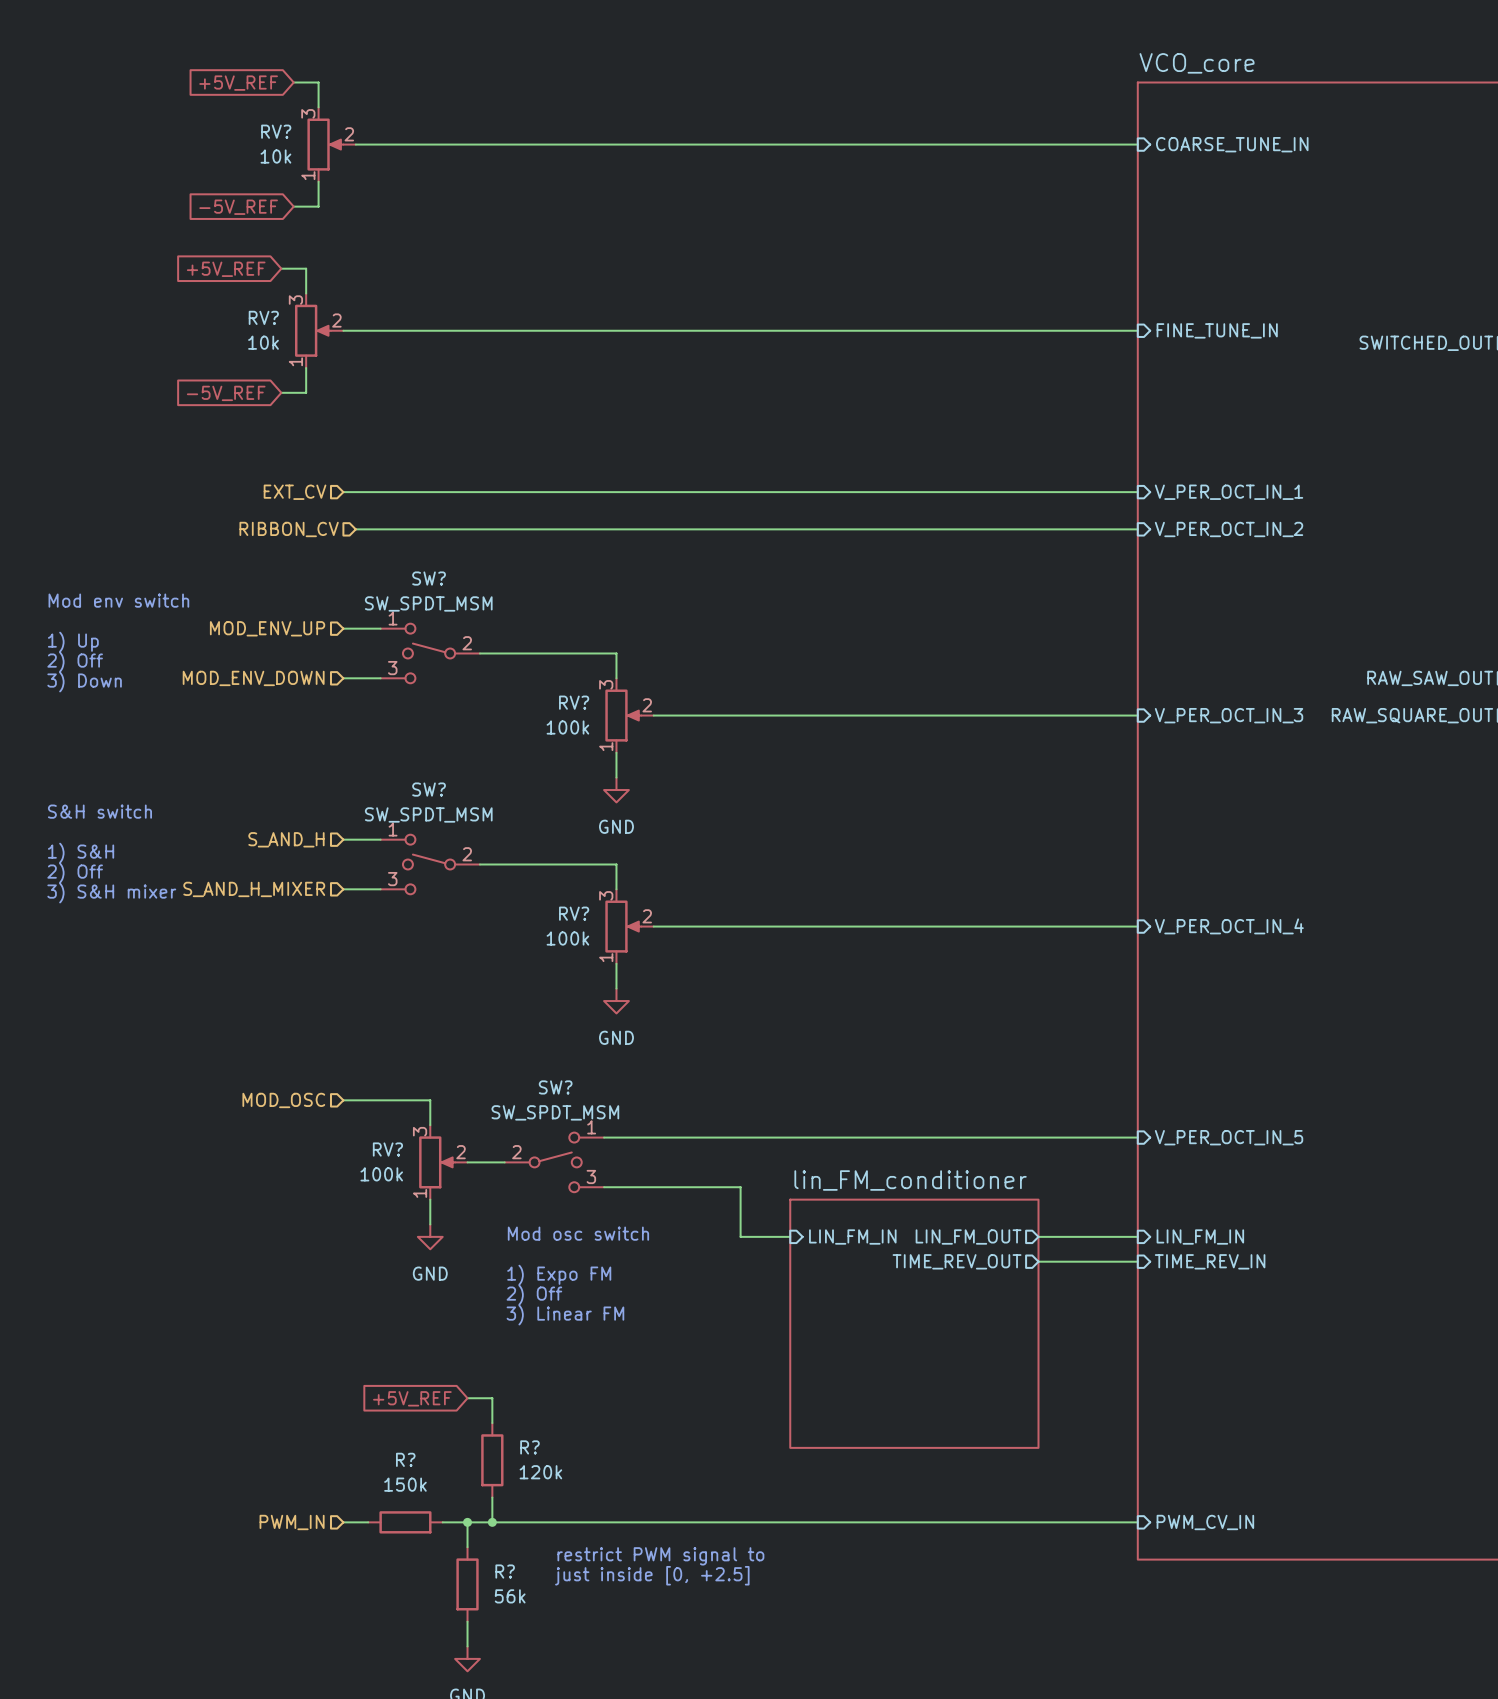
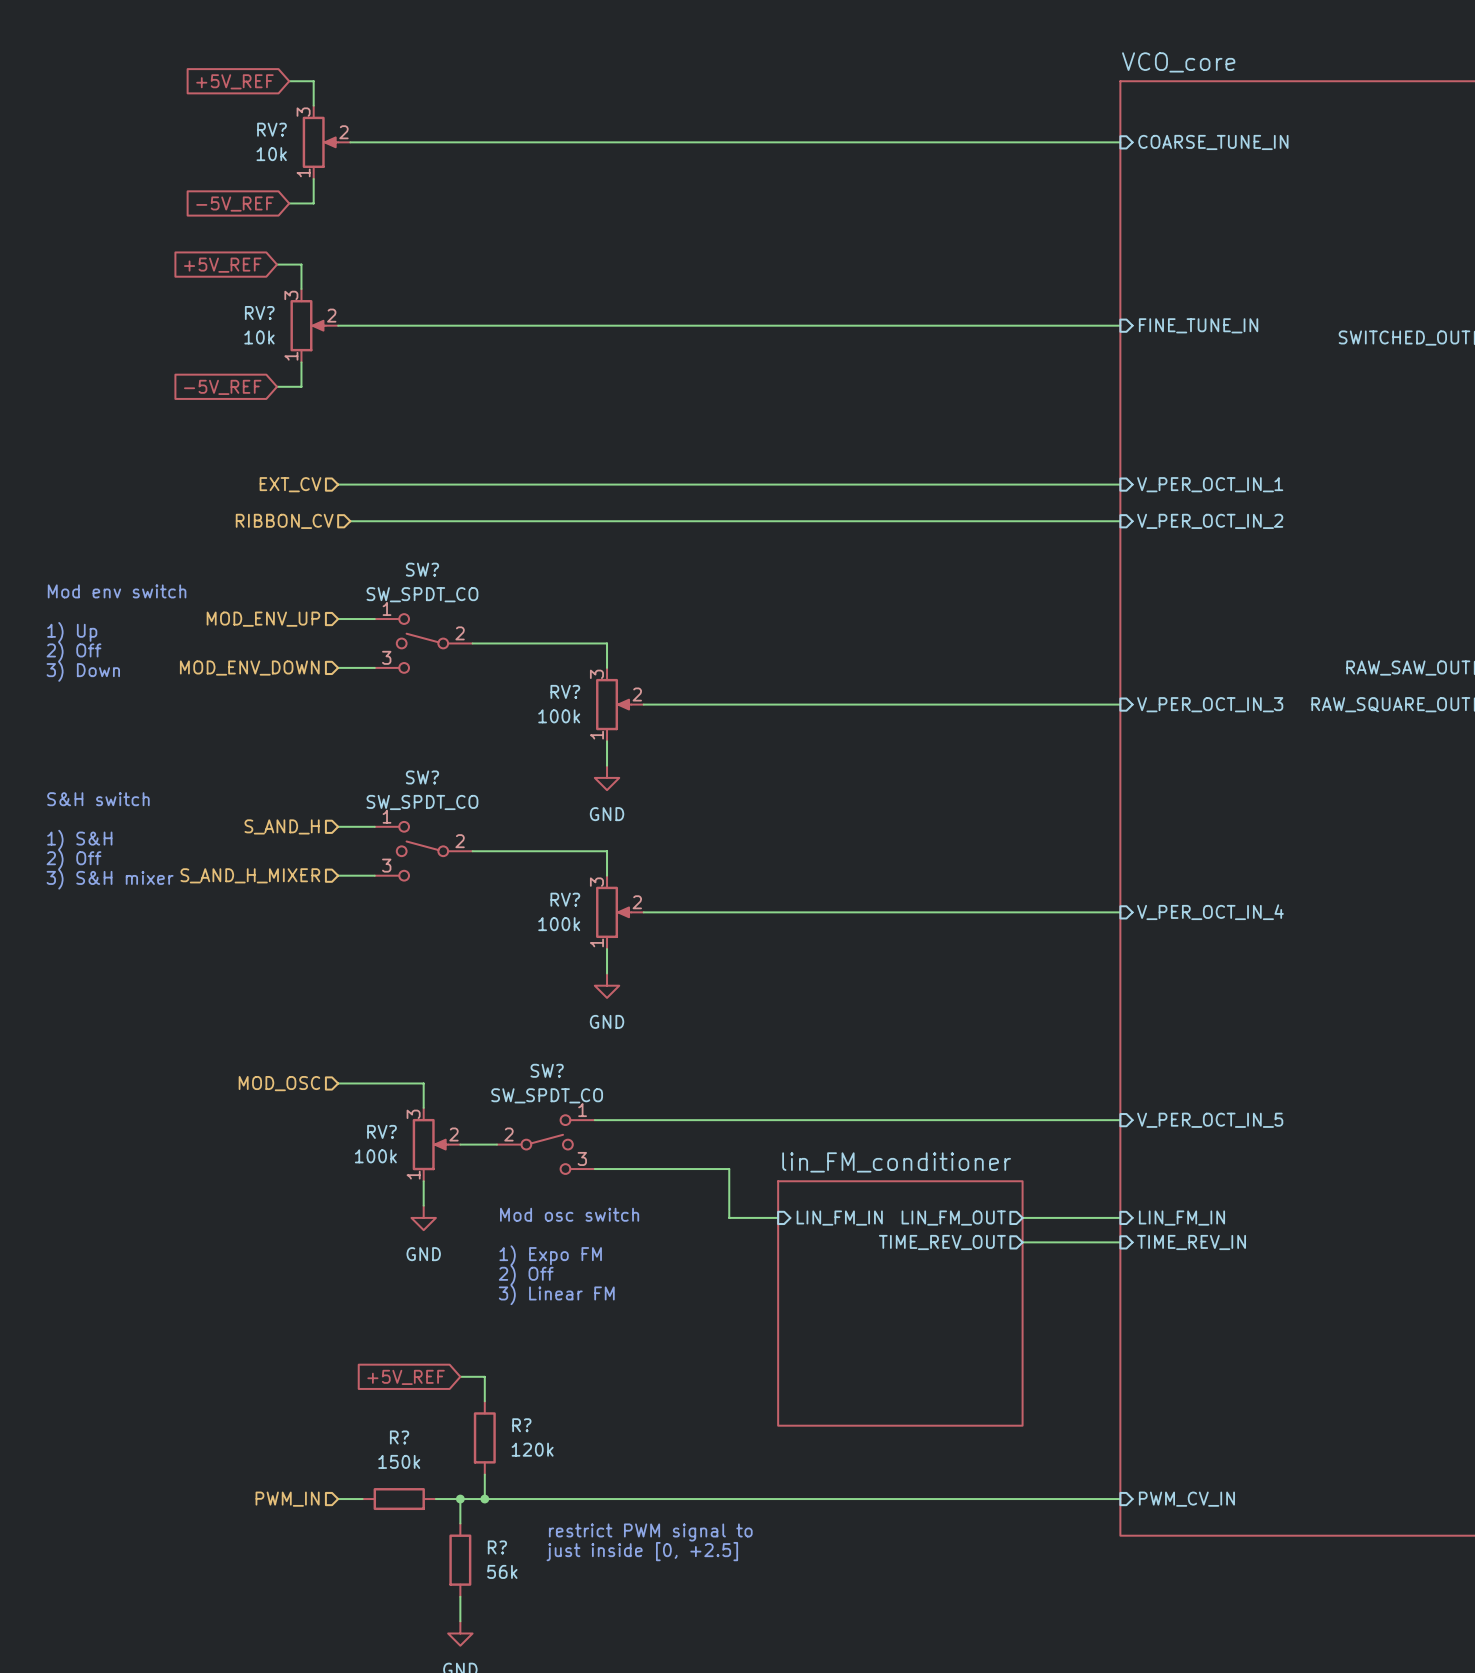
SW? value: SW_SPDT_MSM (428, 603) -> SW_SPDT_CO (422, 594)
SW? value: SW_SPDT_MSM (428, 814) -> SW_SPDT_CO (422, 802)
SW? value: SW_SPDT_MSM (555, 1112) -> SW_SPDT_CO (547, 1095)

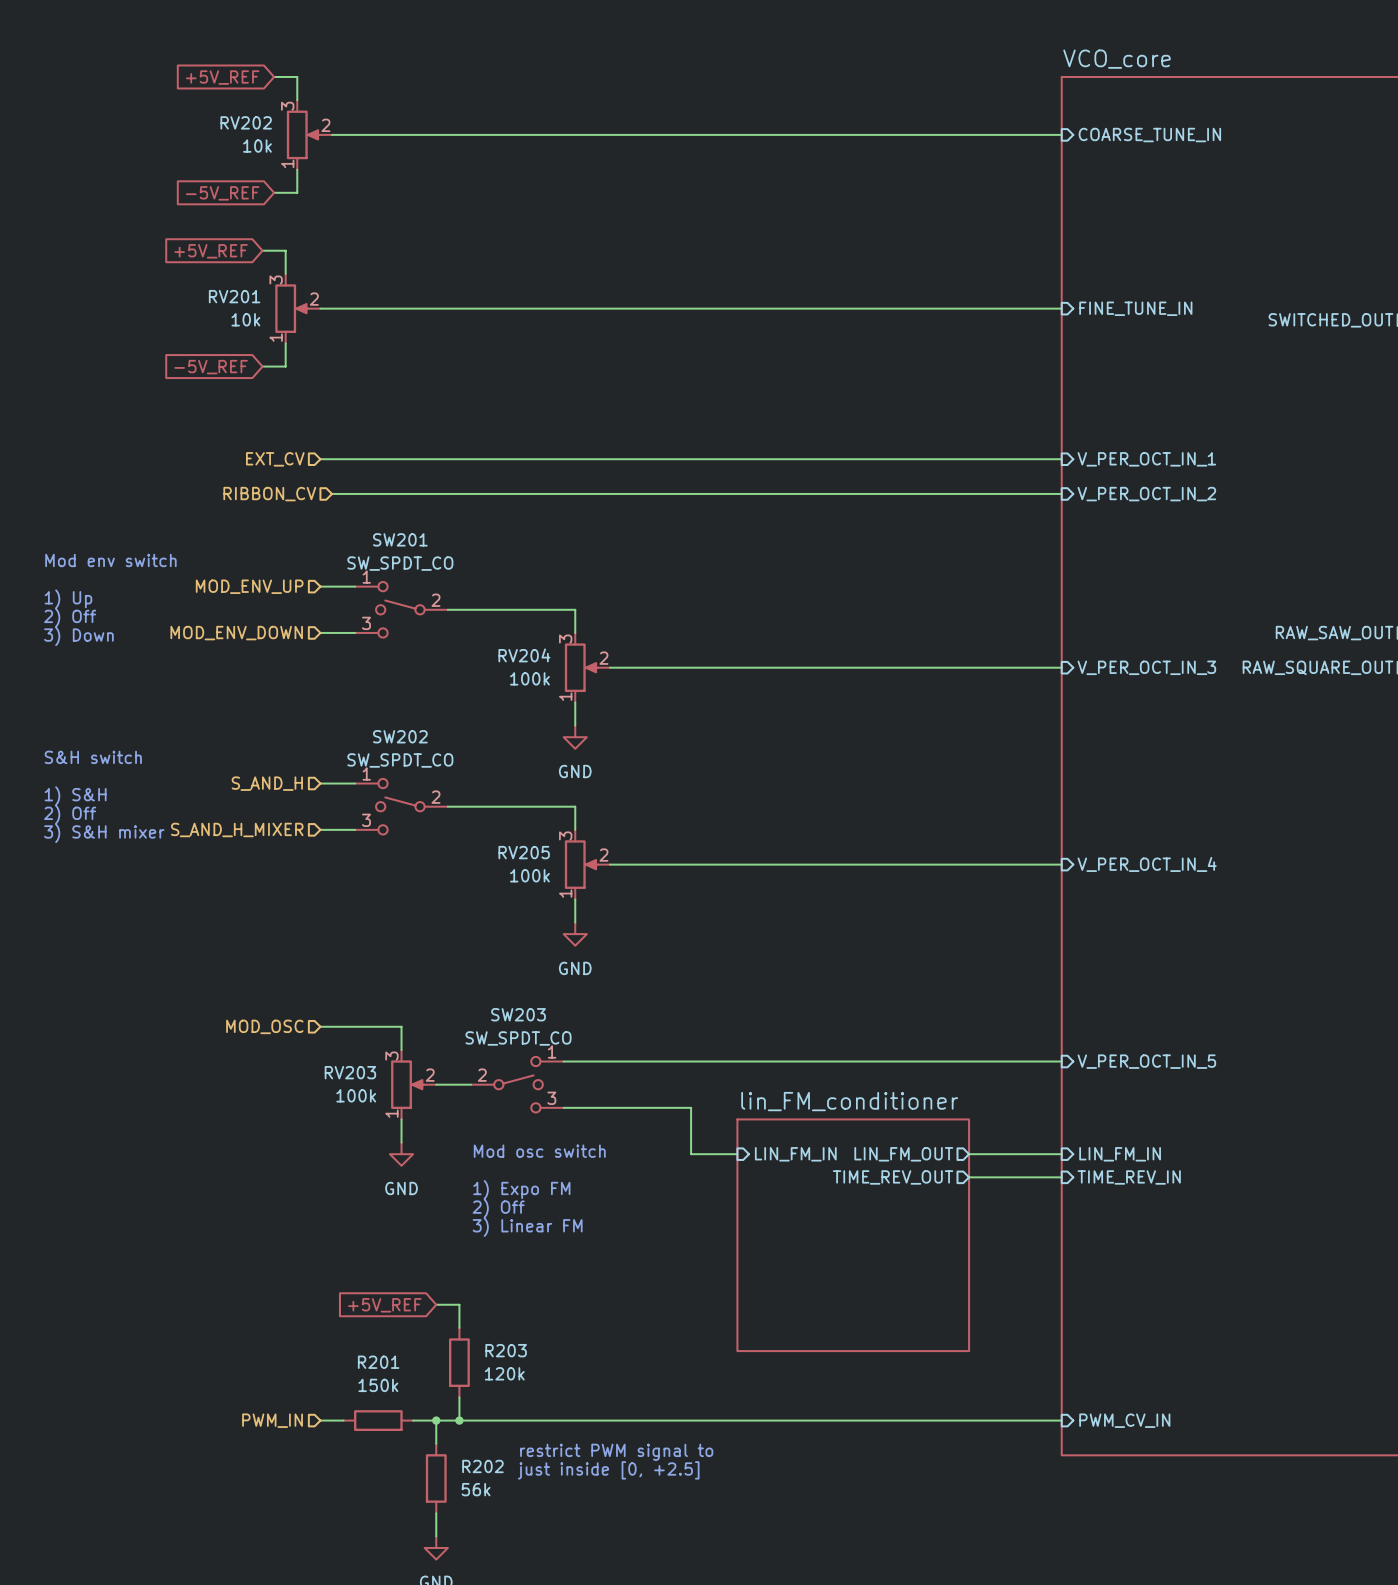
RV? name: RV? (271, 129) -> RV202 (246, 122)
RV? name: RV? (259, 313) -> RV201 (234, 296)
SW? name: SW? (422, 569) -> SW201 (400, 539)
RV? name: RV? (565, 691) -> RV204 (524, 655)
SW? name: SW? (422, 777) -> SW202 (400, 736)
RV? name: RV? (565, 899) -> RV205 (524, 852)
SW? name: SW? (547, 1070) -> SW203 (518, 1014)
RV? name: RV? (381, 1131) -> RV203 (350, 1072)
R? name: R? (521, 1425) -> R203 (506, 1350)
R? name: R? (399, 1437) -> R201 (378, 1362)
R? name: R? (497, 1547) -> R202 (482, 1466)

